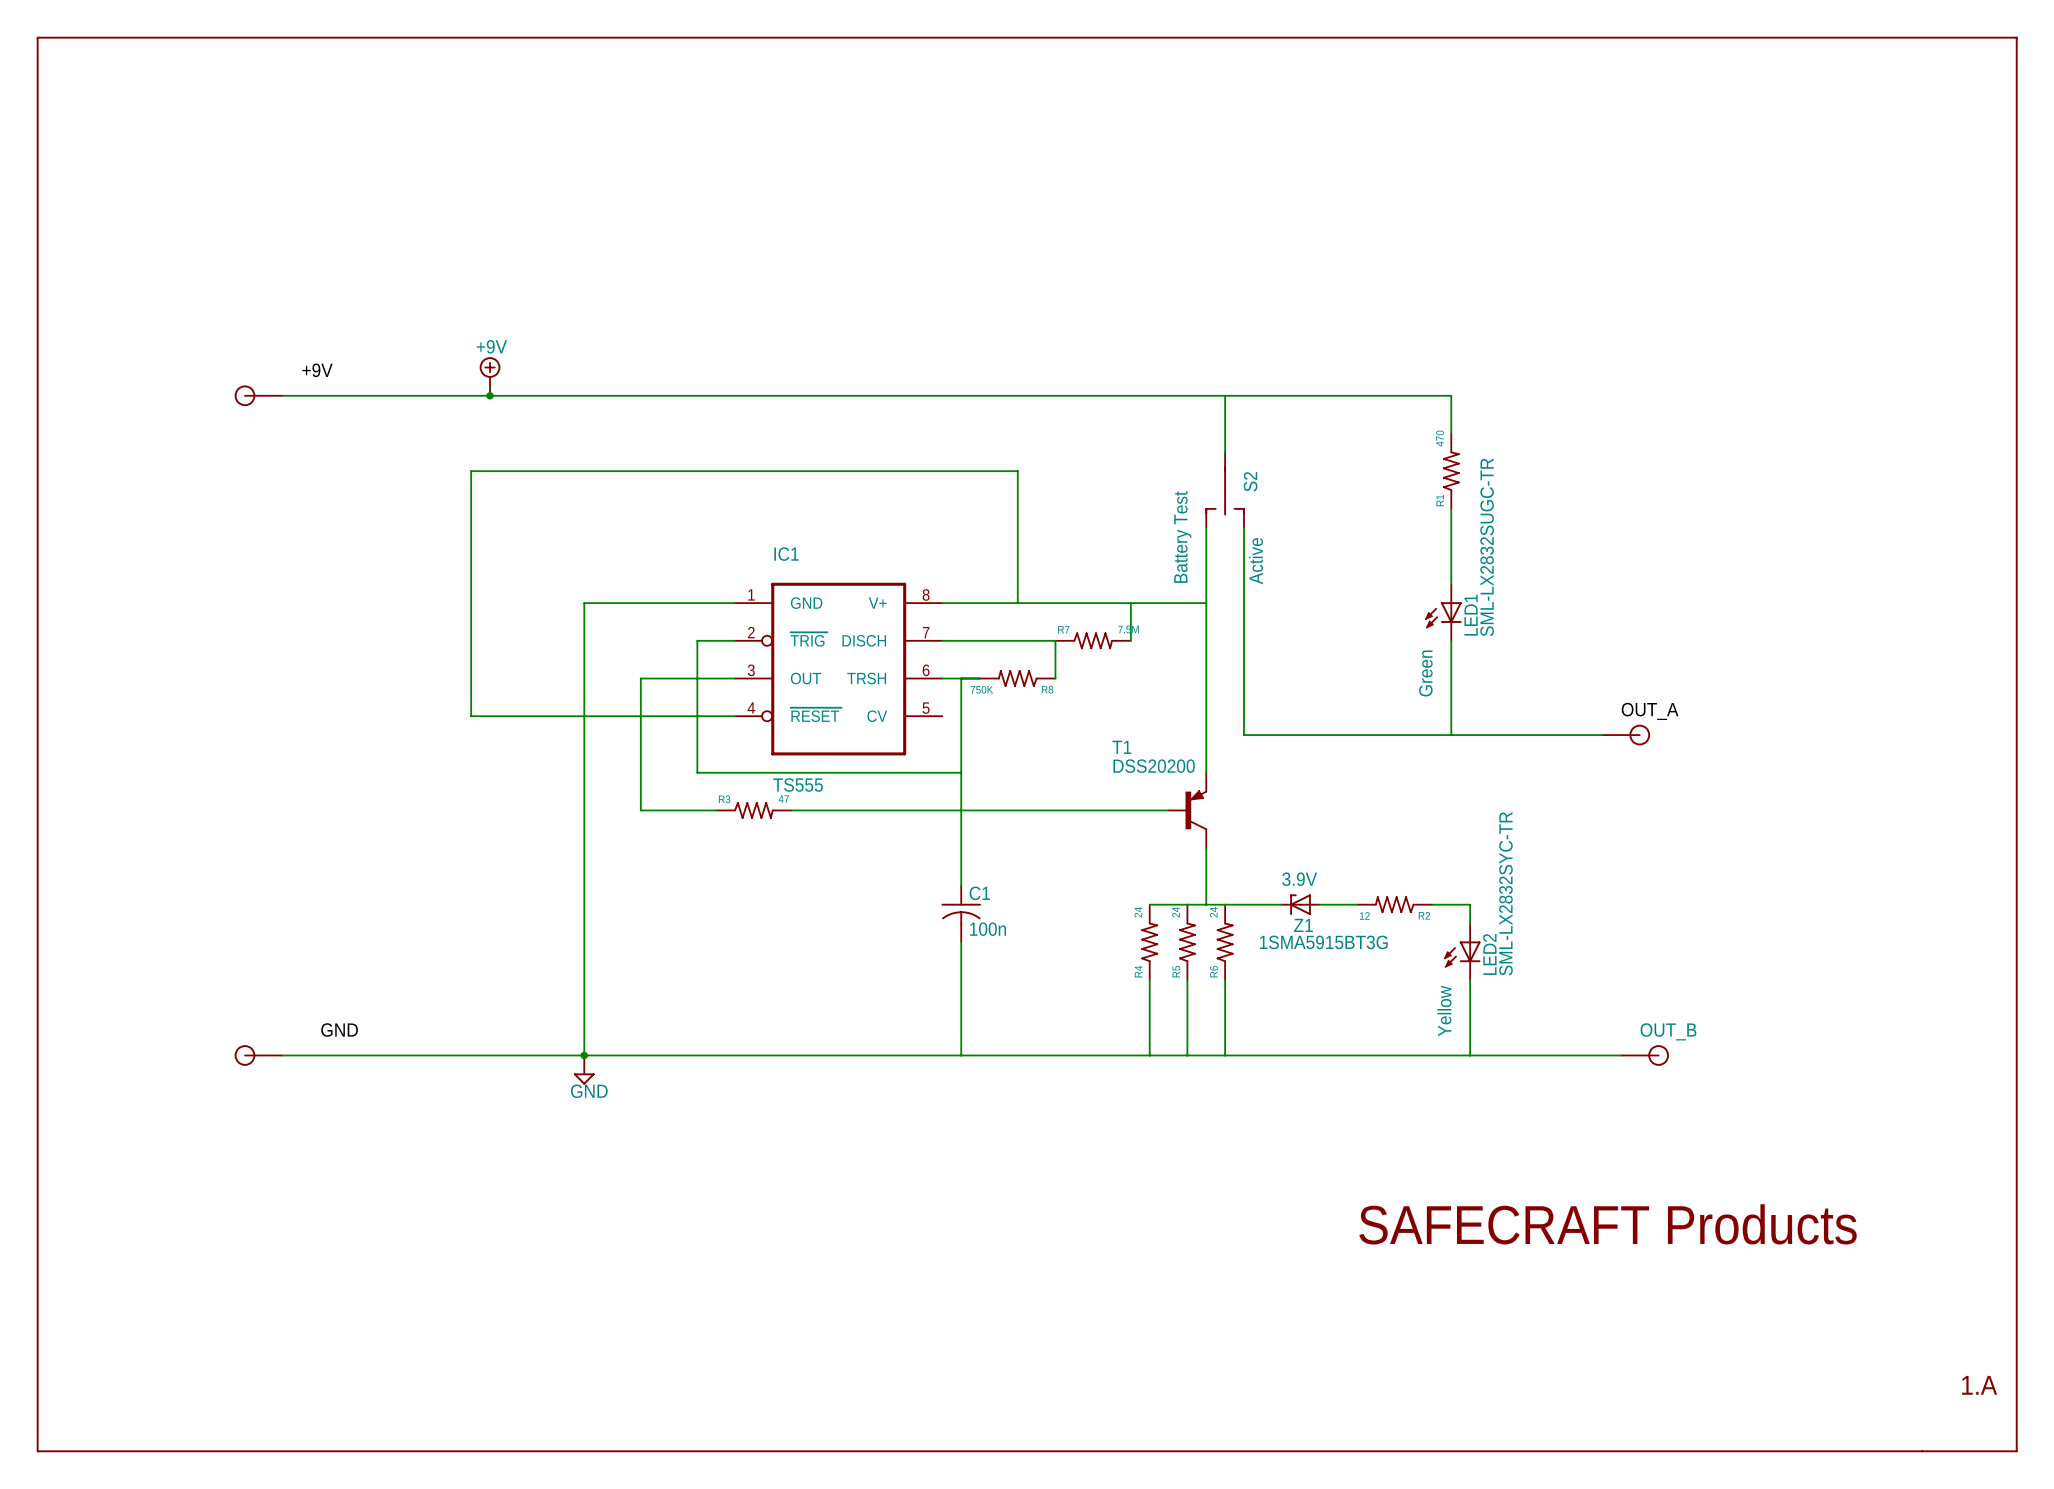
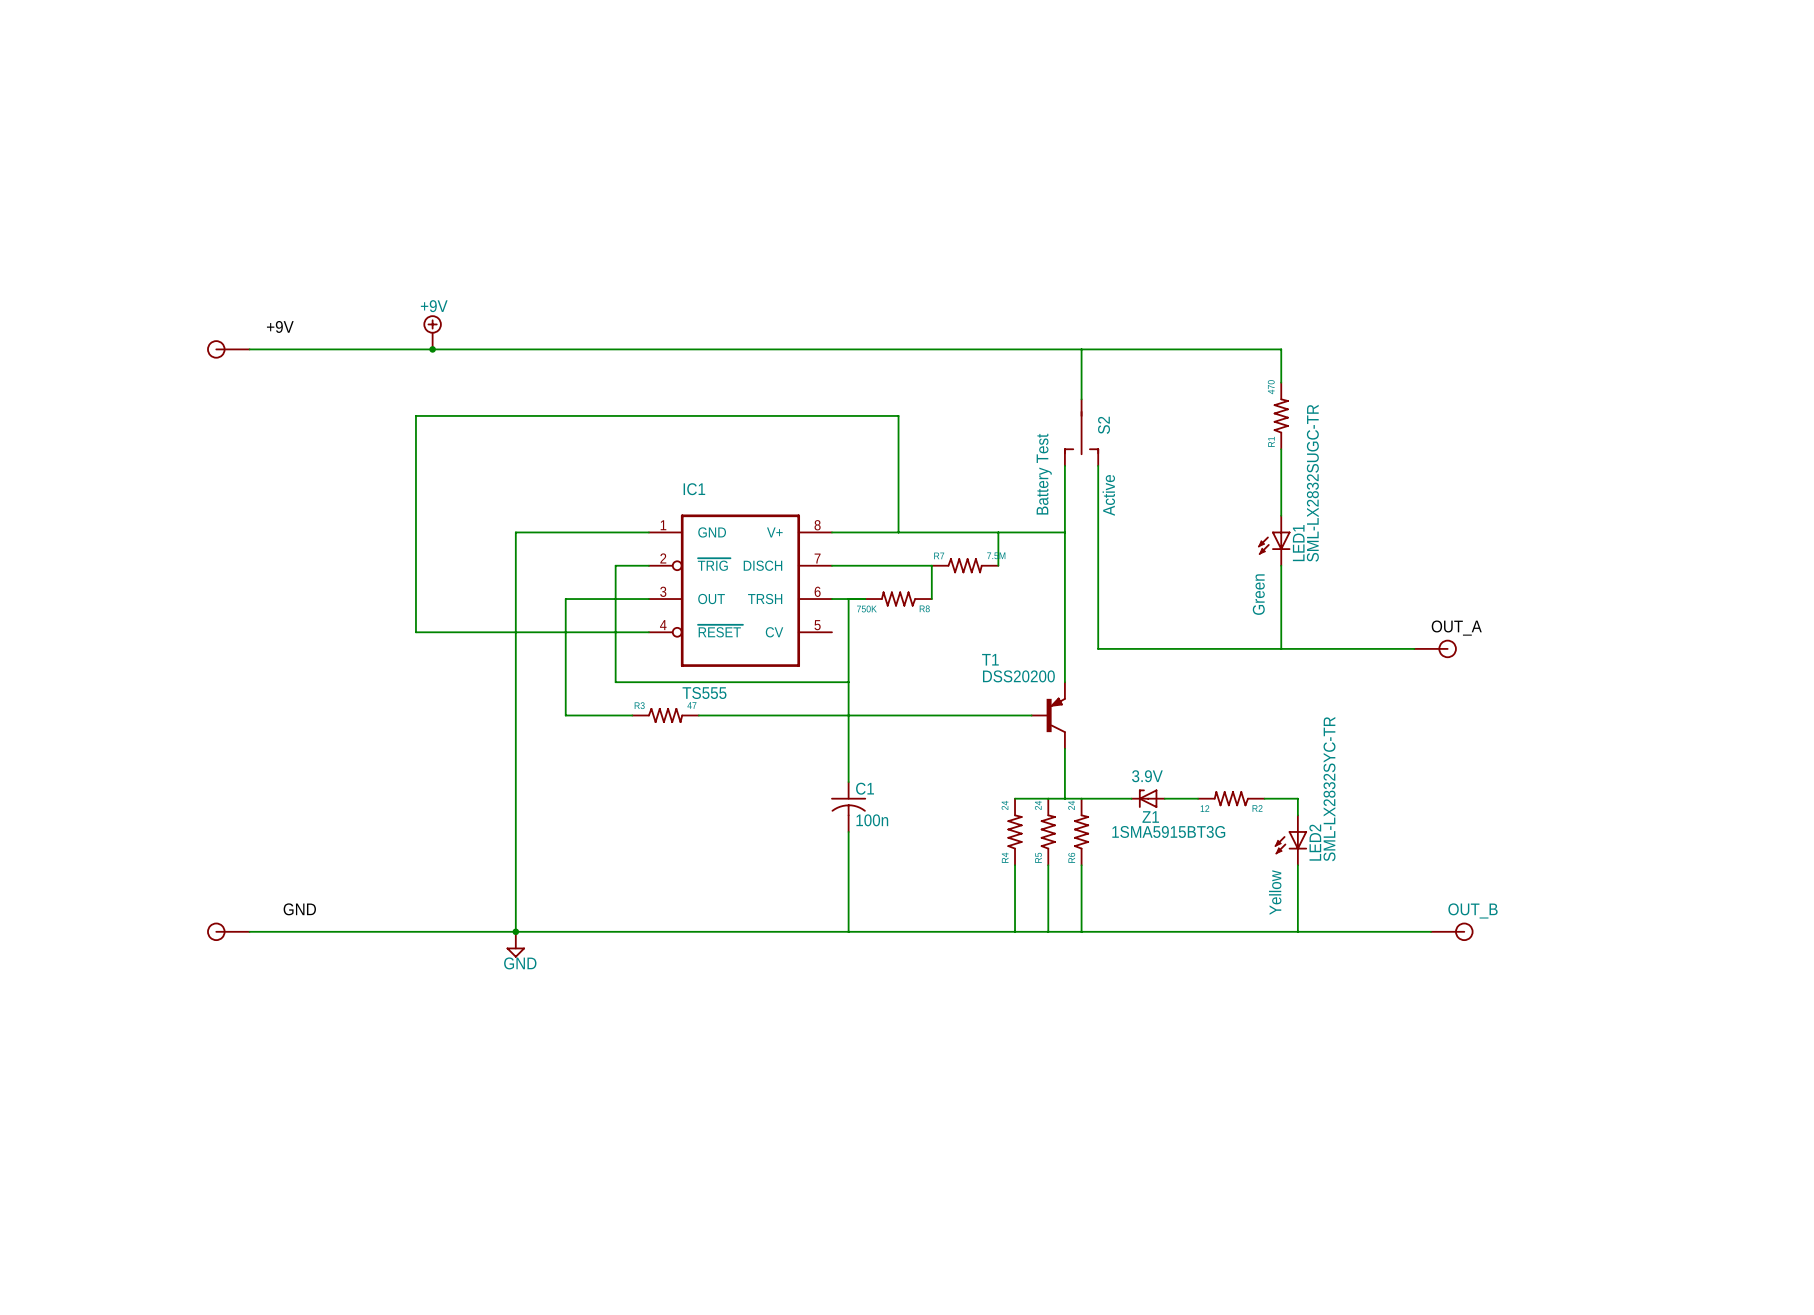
part: (1027, 744) -> none
text: SAFECRAFT Products (1608, 1224) -> none
text: 1.A (1979, 1385) -> none

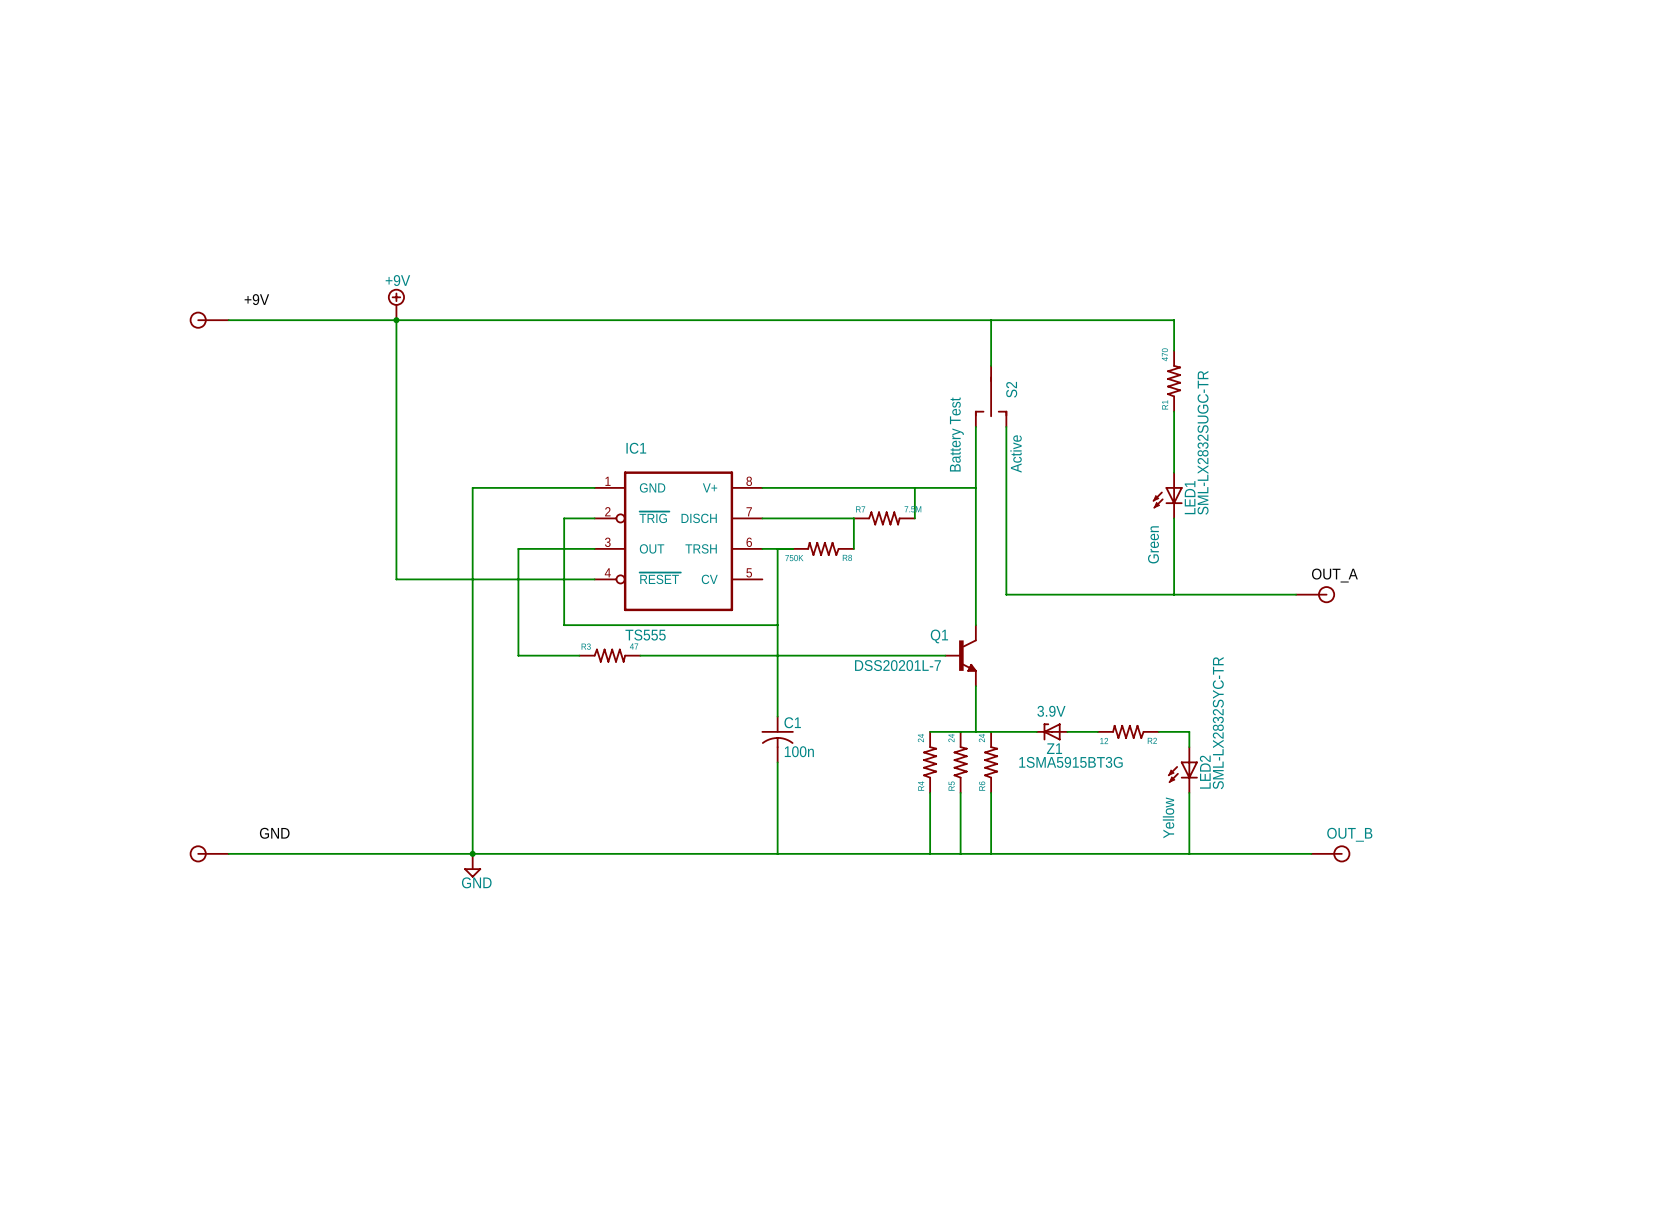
wire: (898, 532) (898, 415) (415, 415) (415, 632) (432, 632) -> (396, 320) (396, 579)
T1: DSS20200 (1048, 715) -> none
Q1: none -> DSS20201L-7 (960, 655)

